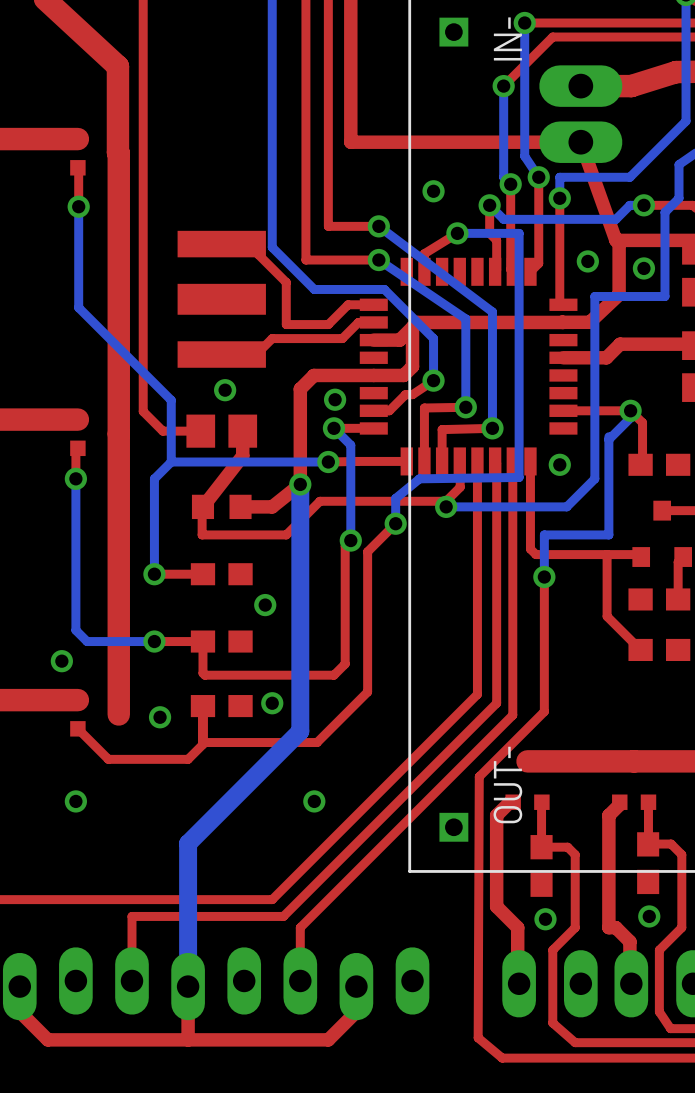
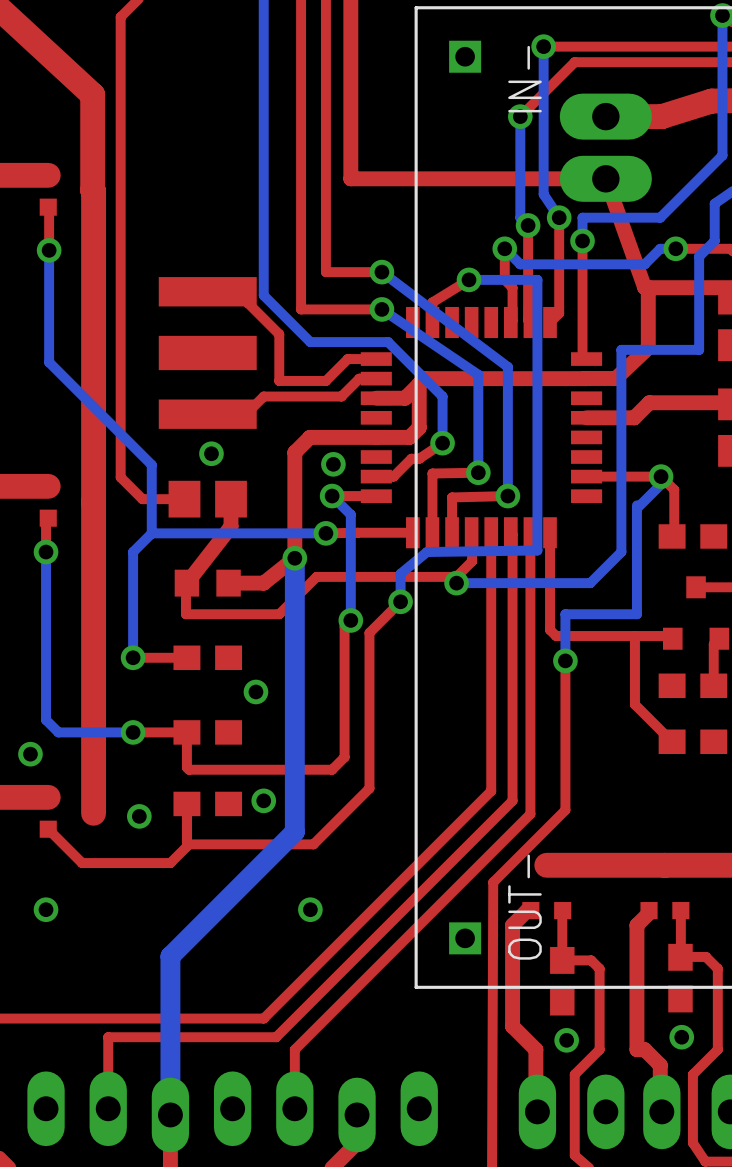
via: (433, 191) -> none
via: (587, 261) -> none
via: (643, 268) -> none
via: (559, 464) -> none

